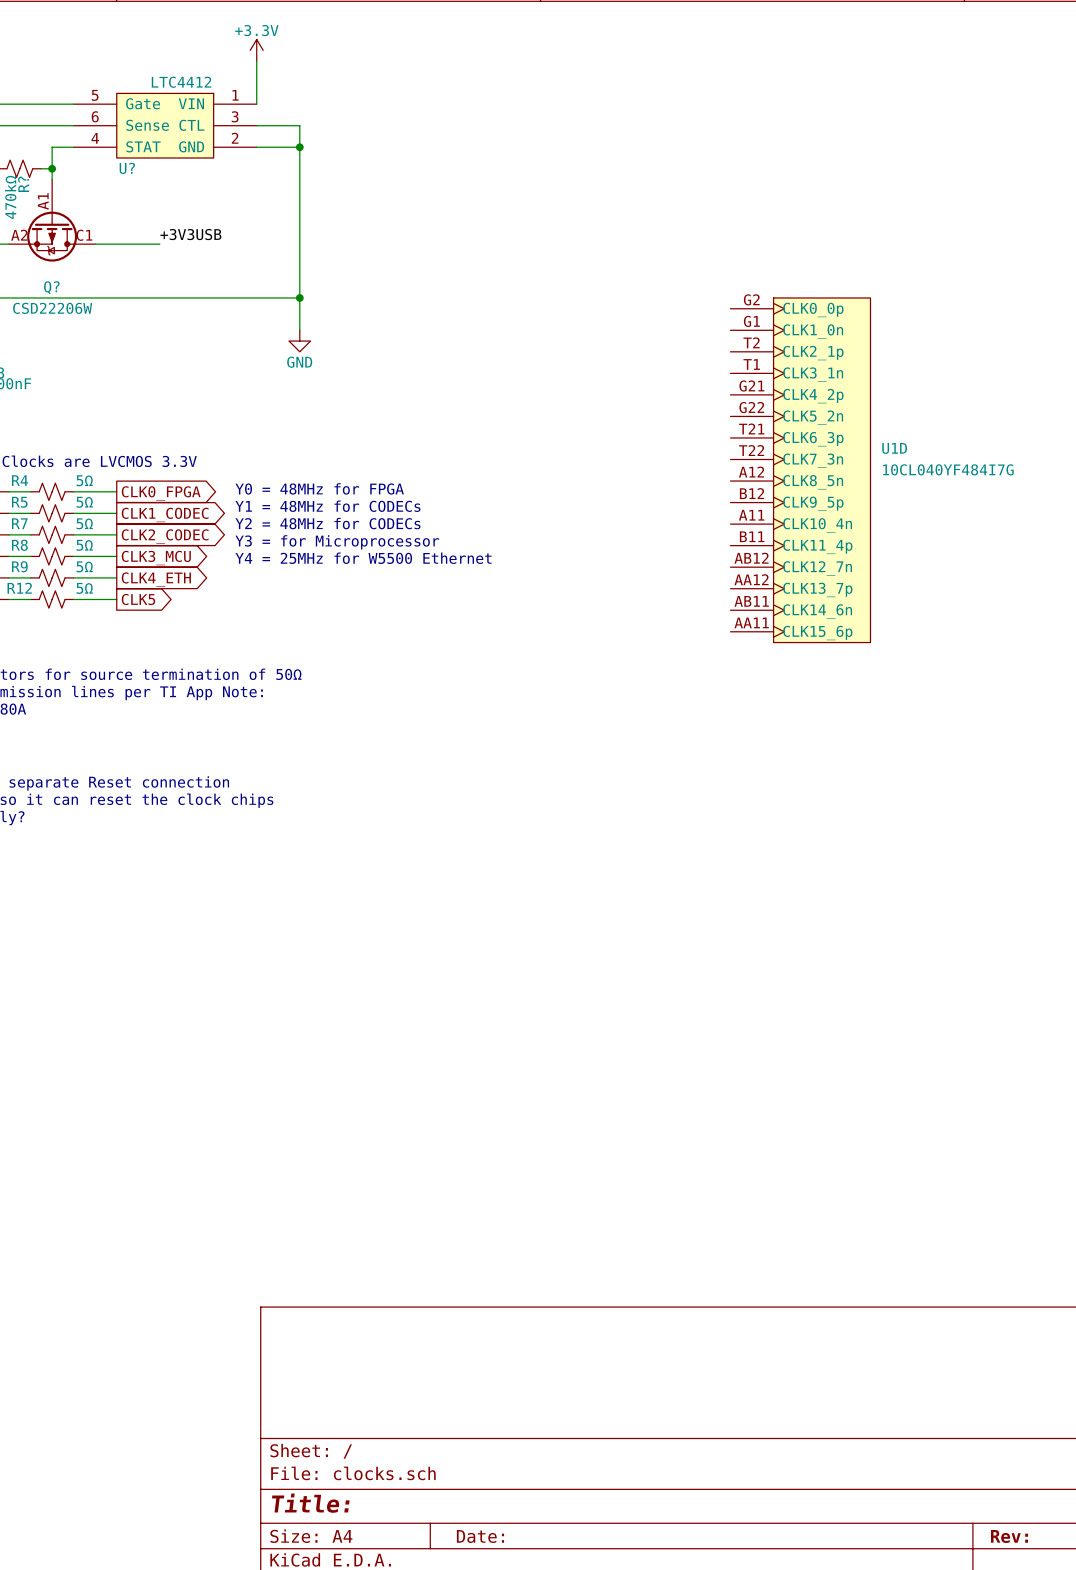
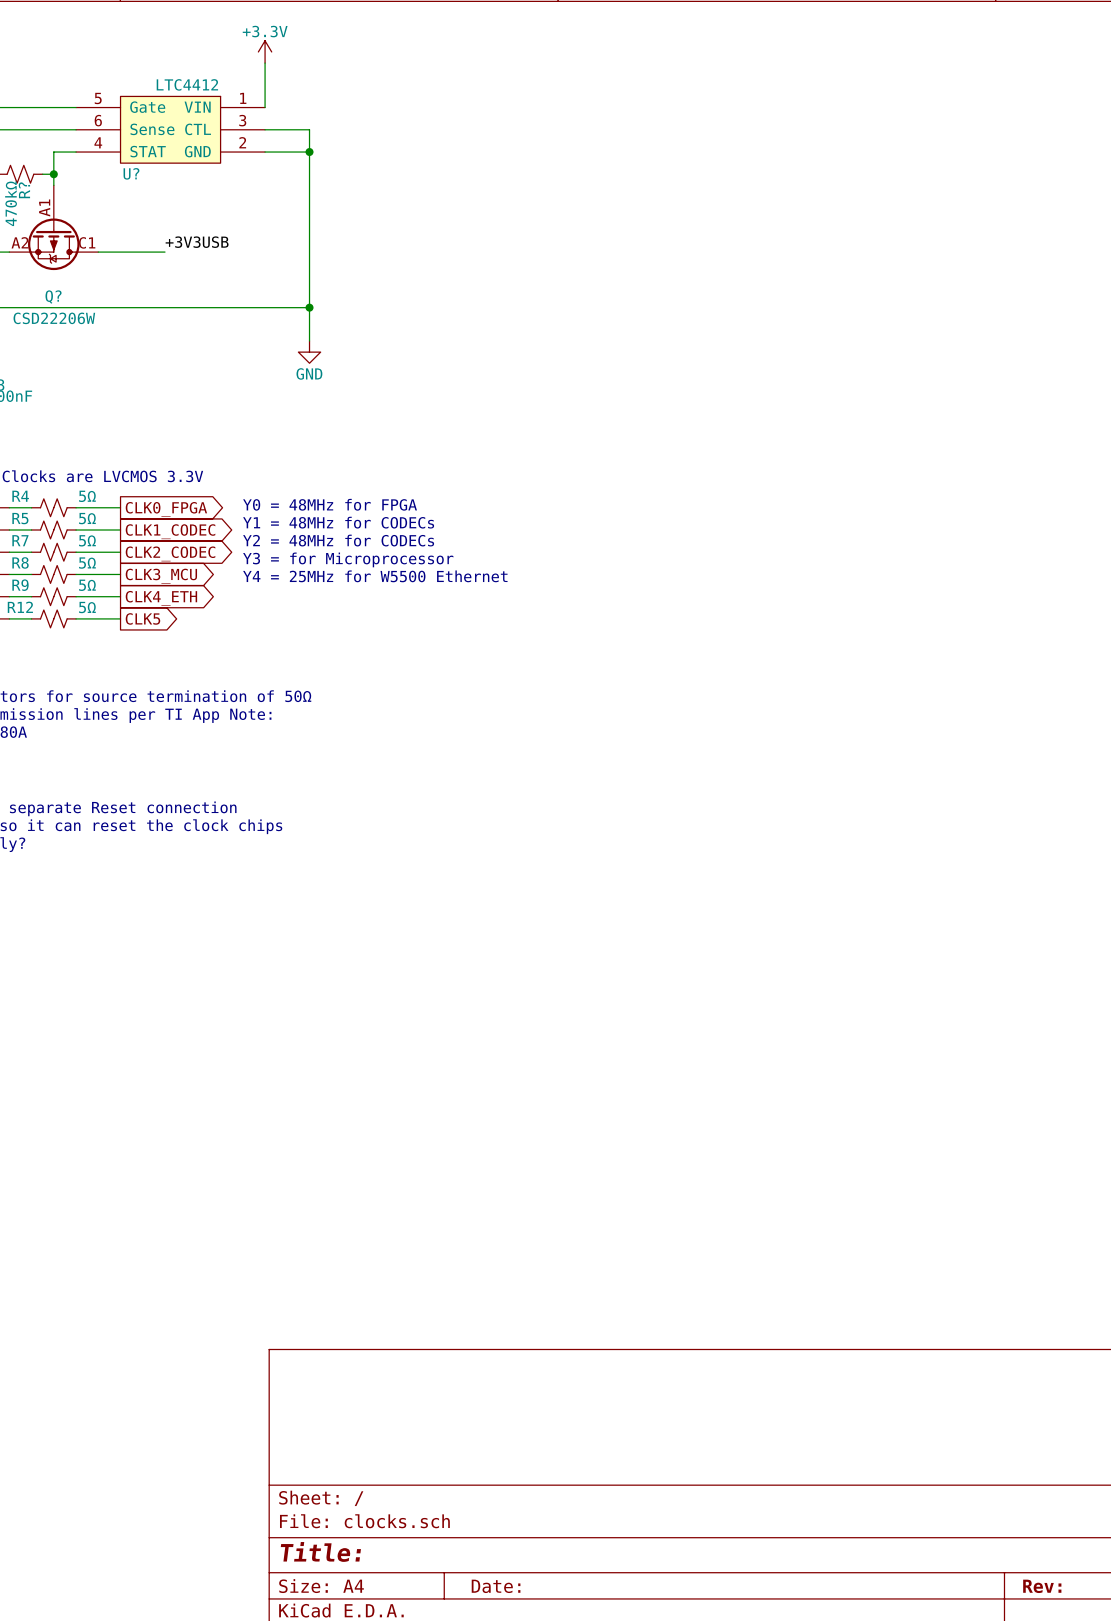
U1D: 10CL040YF484I7G (800, 470) -> none

